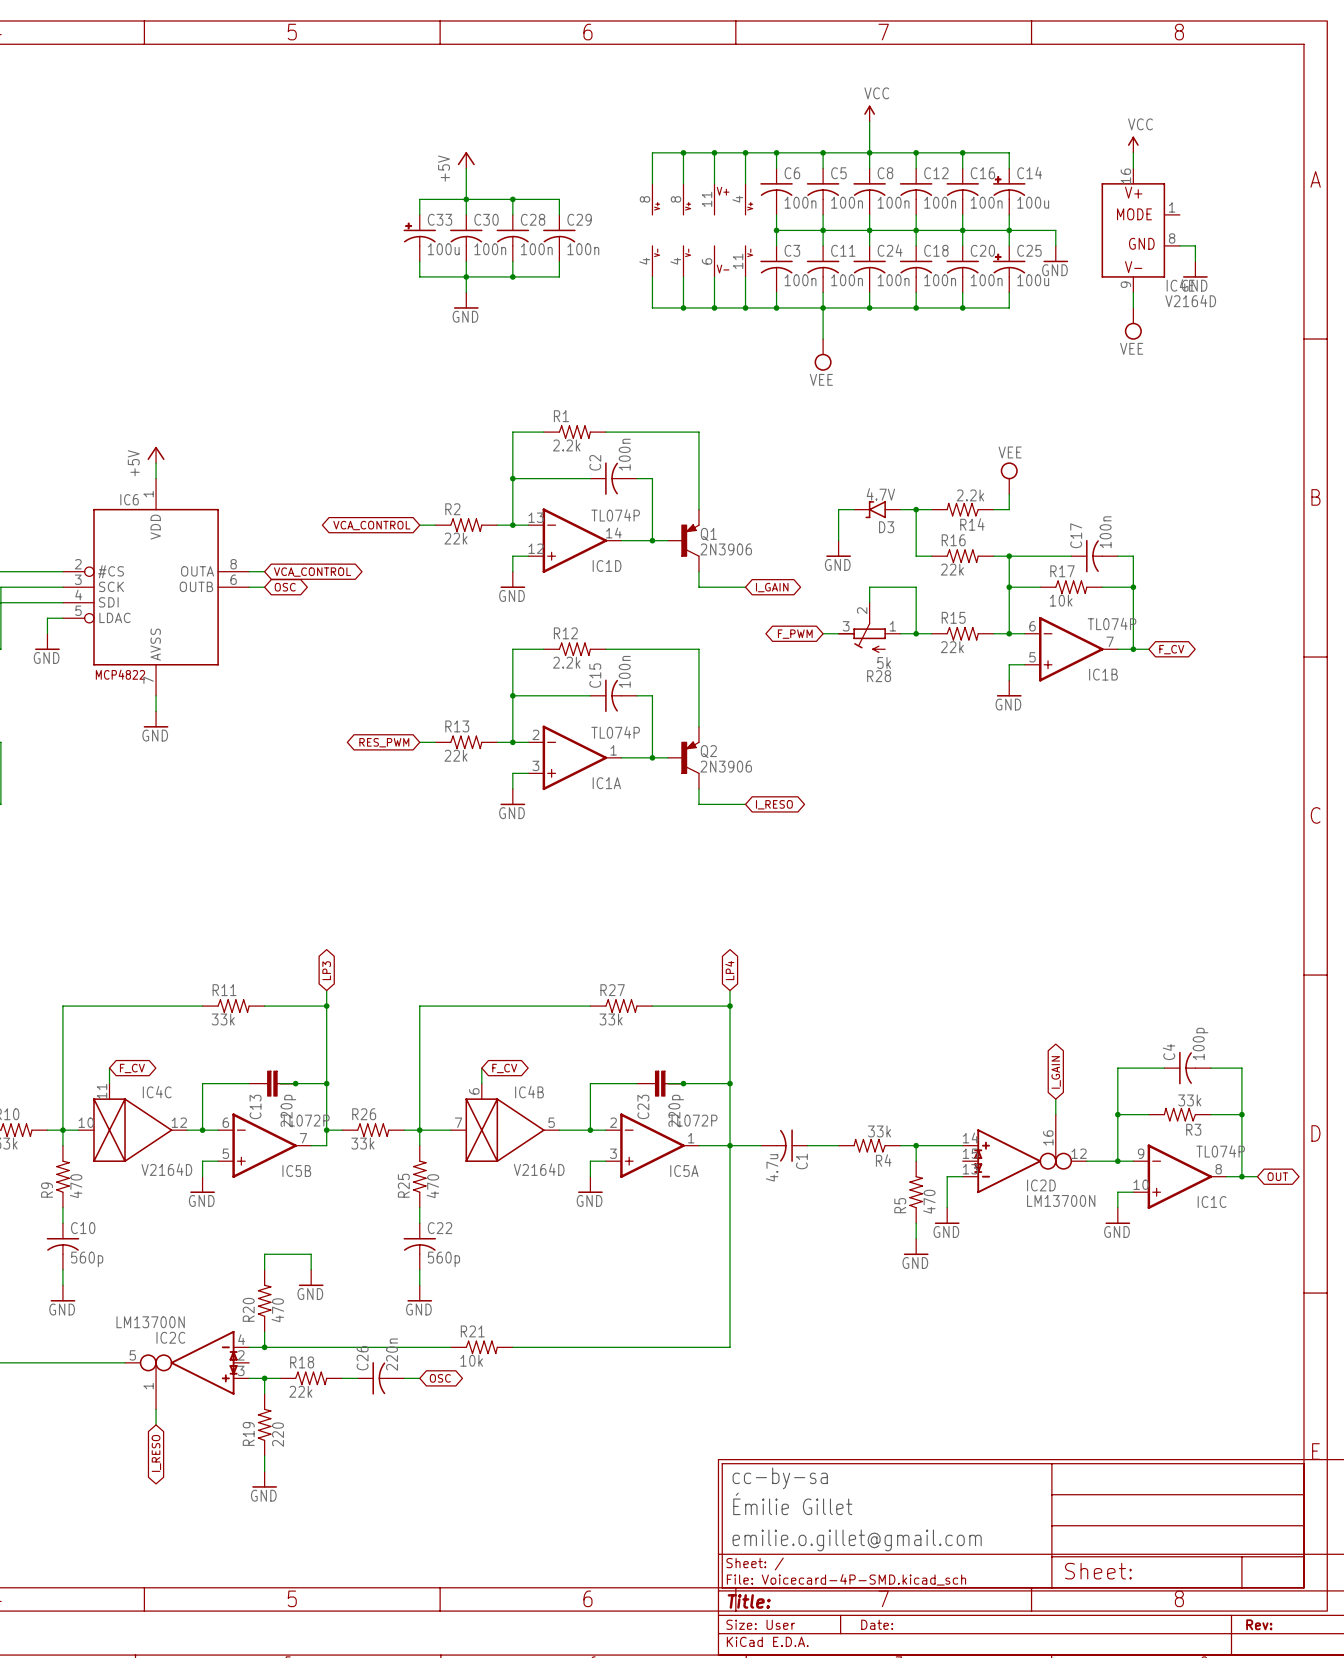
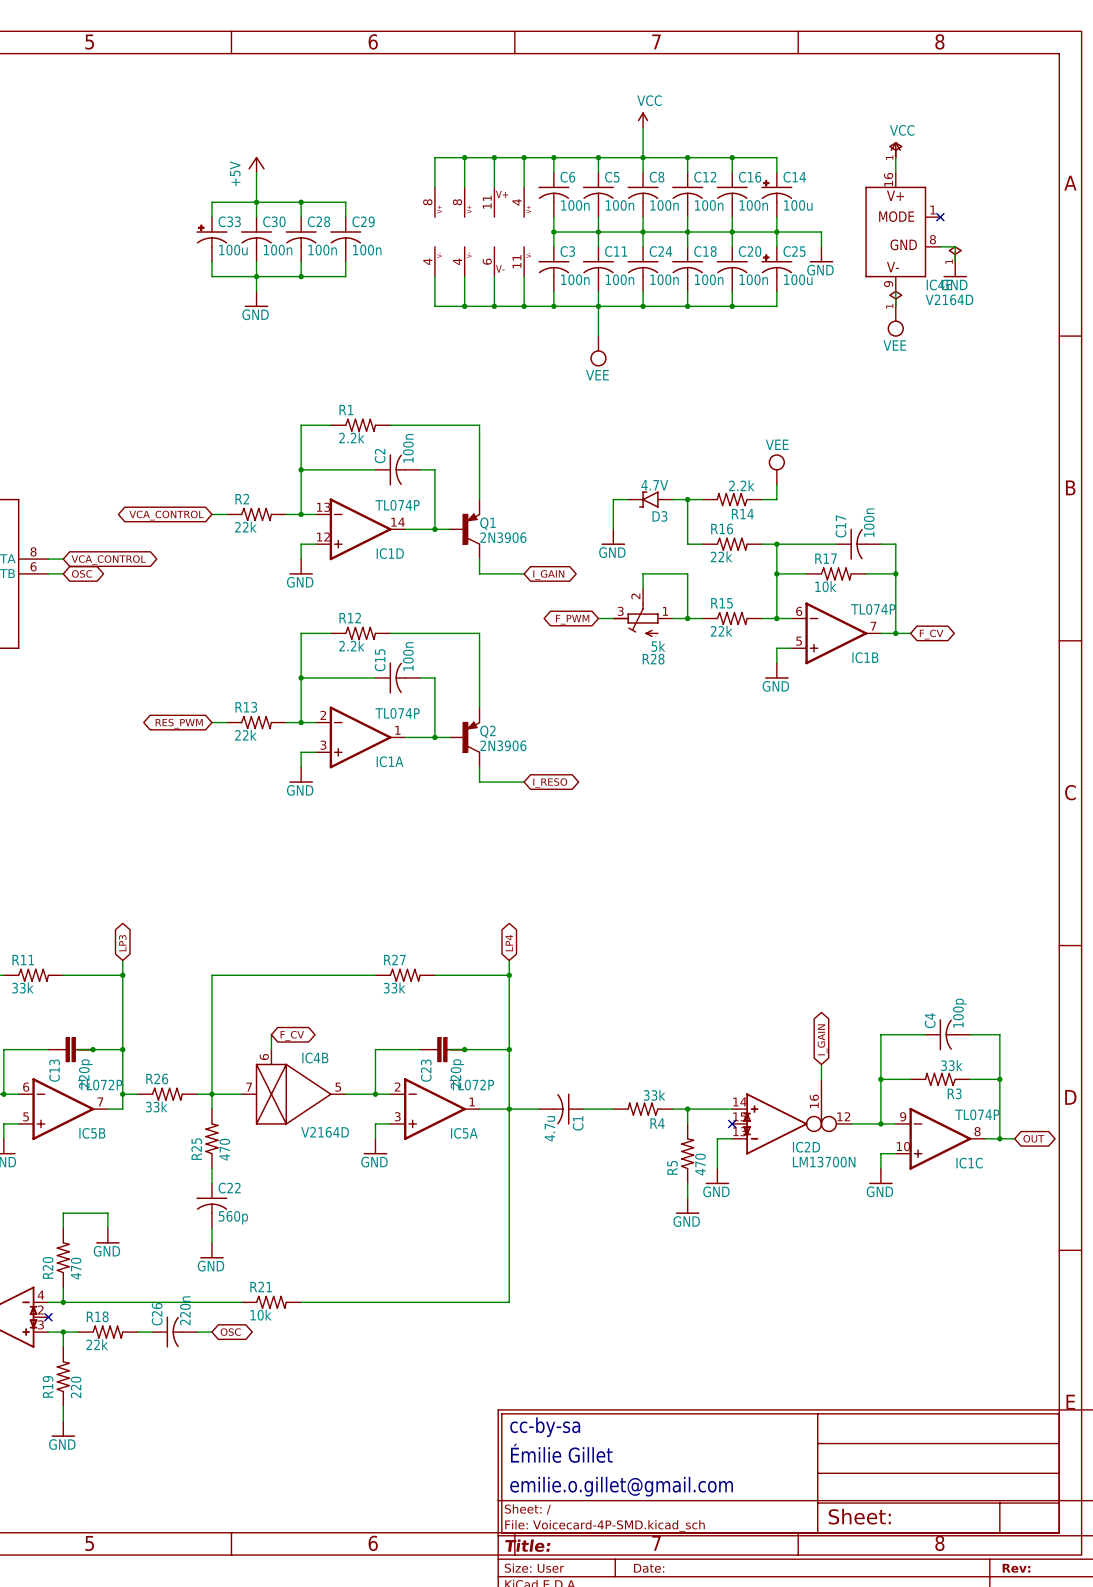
power symbol: none -> (895, 150)
no-connect mark: none -> (940, 217)
power symbol: none -> (955, 254)
power symbol: none -> (895, 298)
no-connect mark: none -> (732, 1123)
no-connect mark: none -> (48, 1317)

